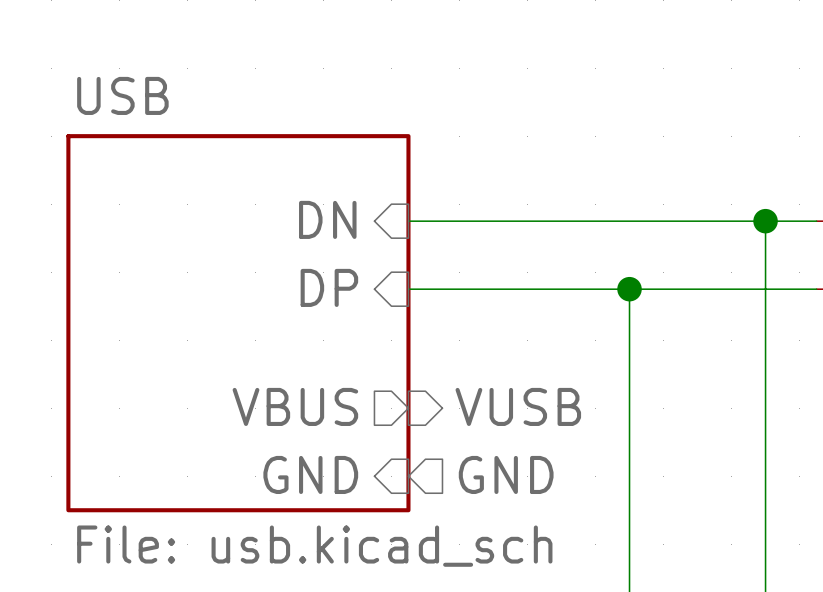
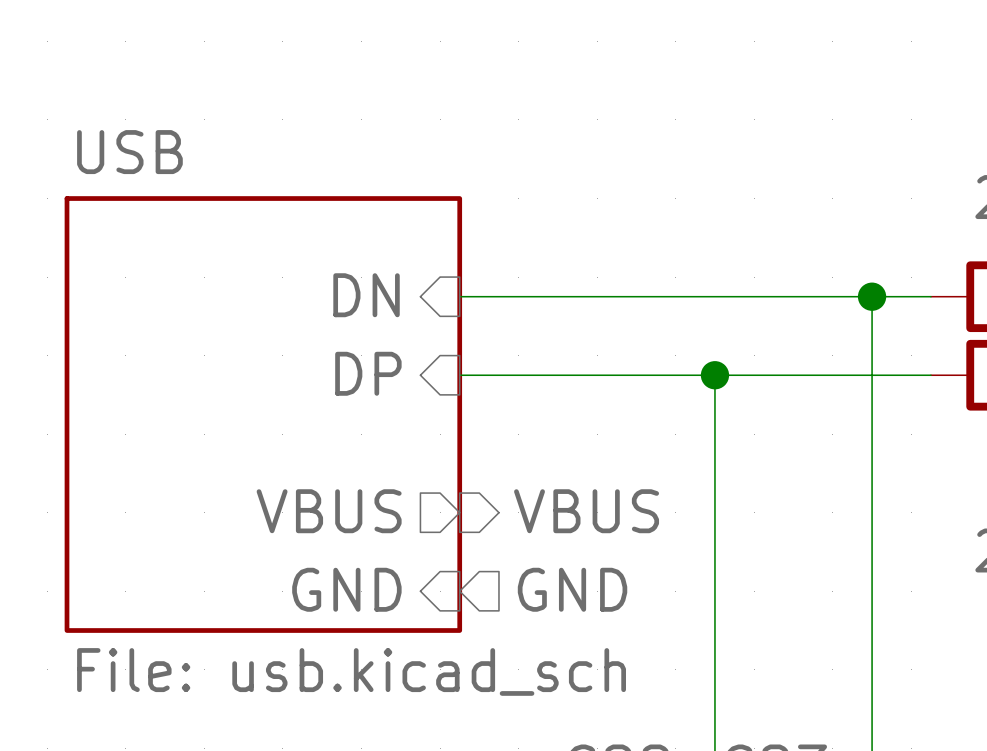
hierarchical label: VUSB (518, 406) -> VBUS (586, 511)

